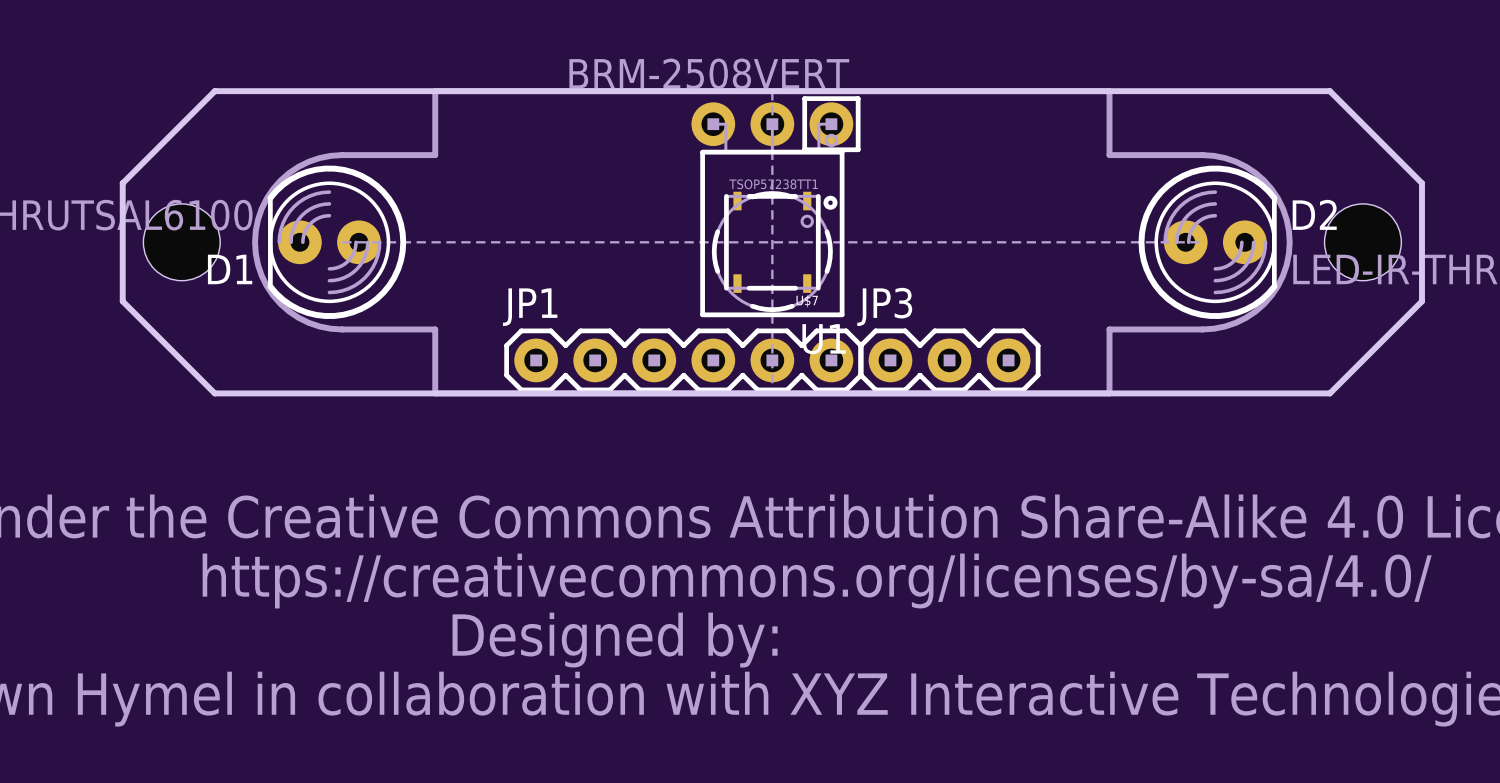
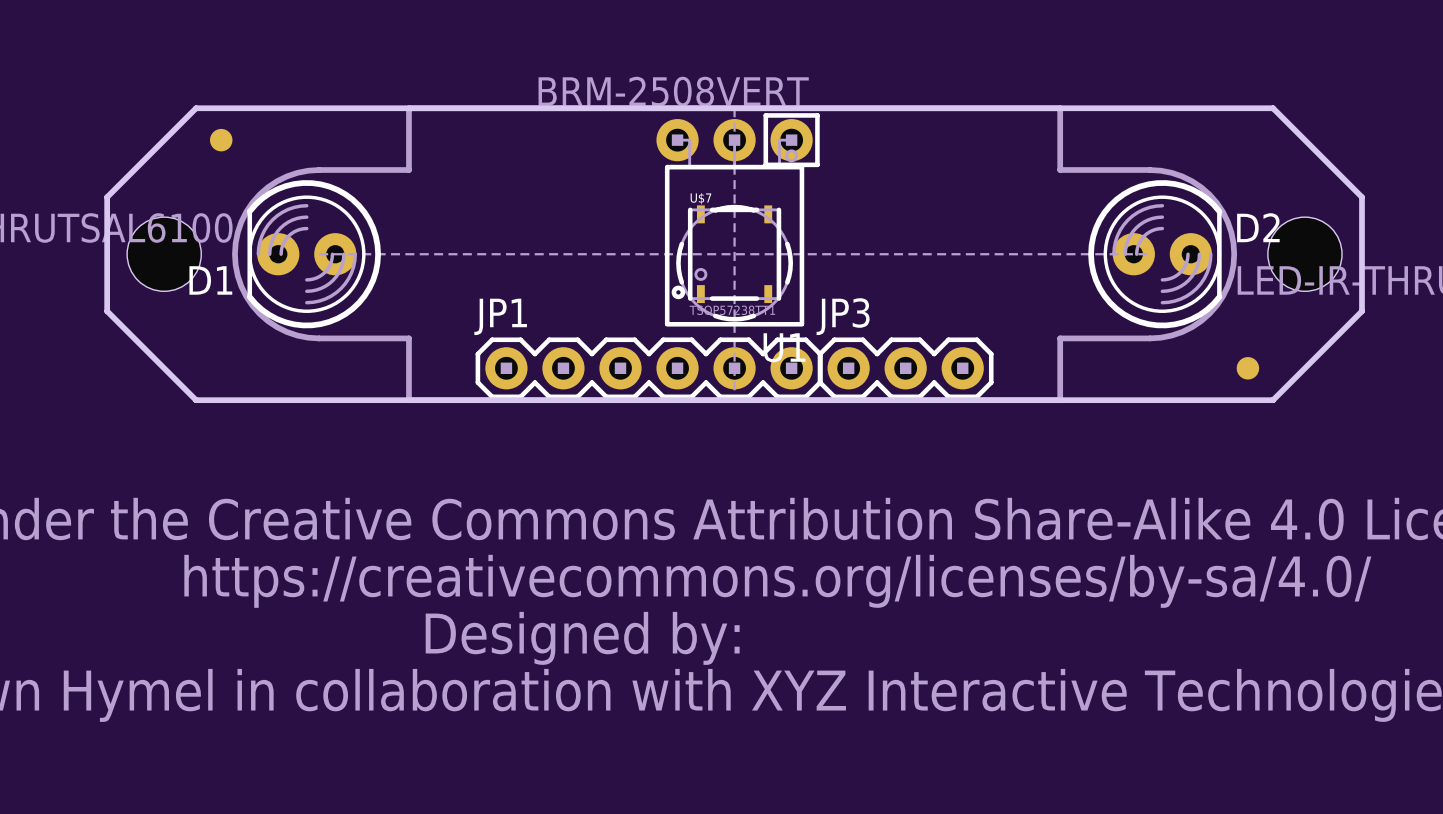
part: none -> (221, 140)
U$7 rotation: 0° (780, 242) -> 180° (726, 254)
part: none -> (1247, 368)

